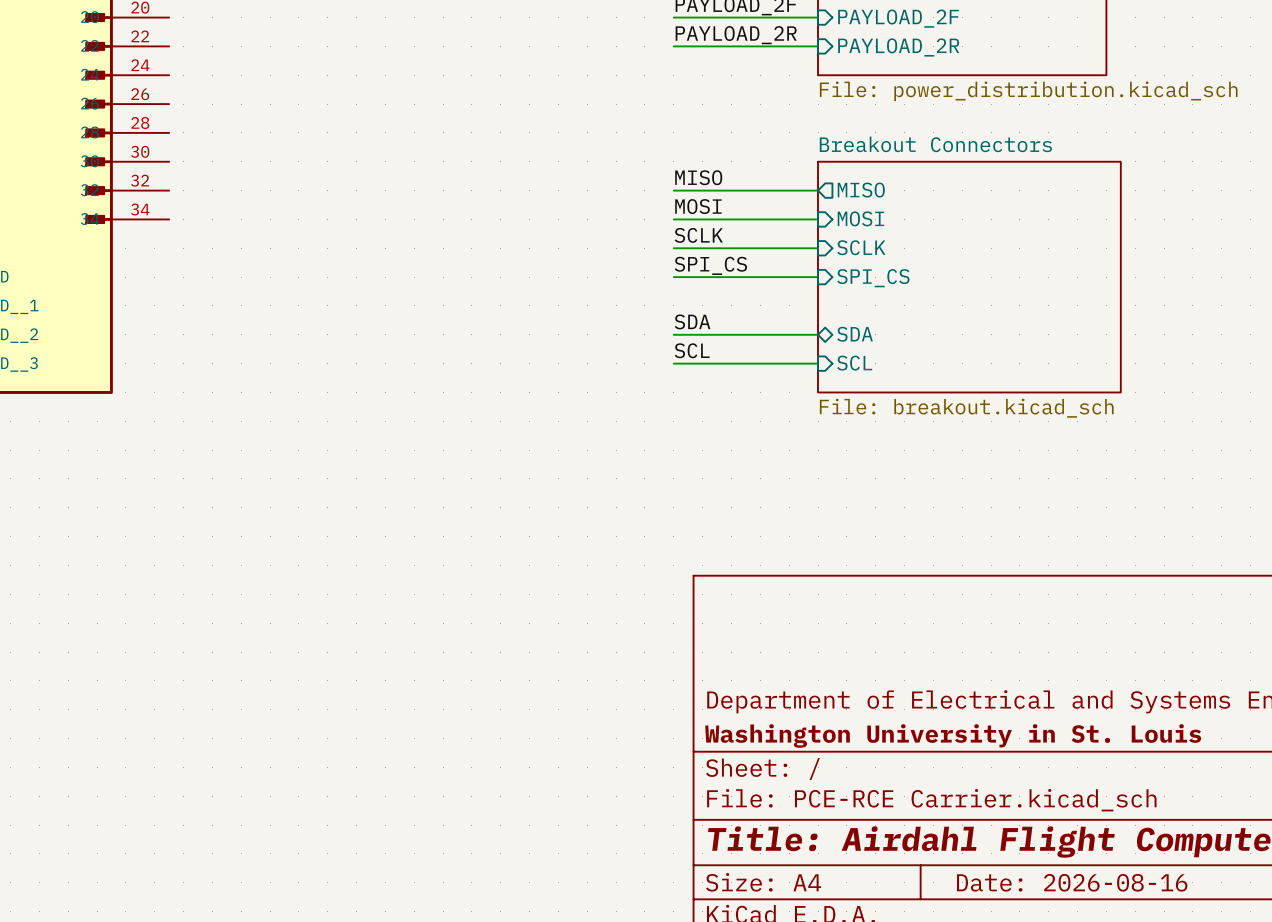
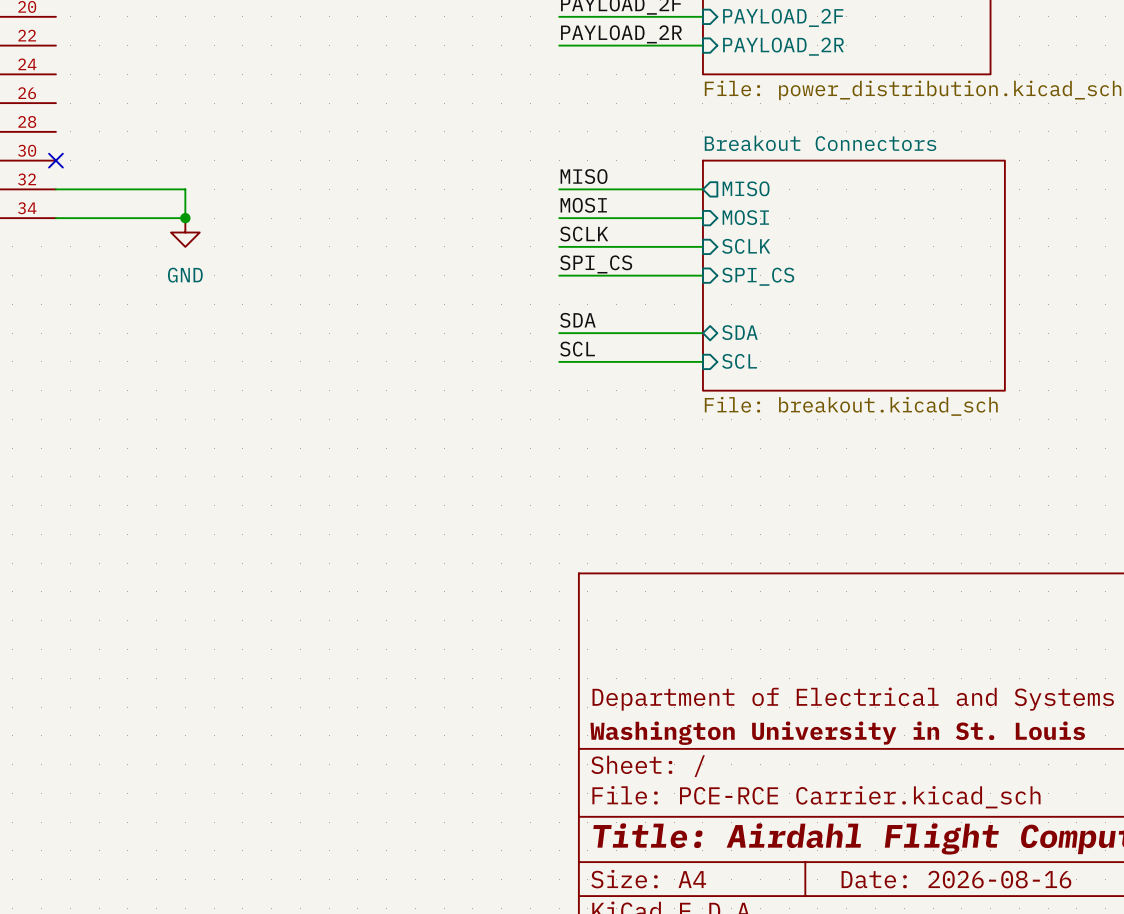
no-connect mark: none -> (55, 160)
wire: none -> (55, 189) (185, 189) (185, 218) (55, 218)
junction: none -> (185, 218)
power symbol: none -> GND (185, 232)

